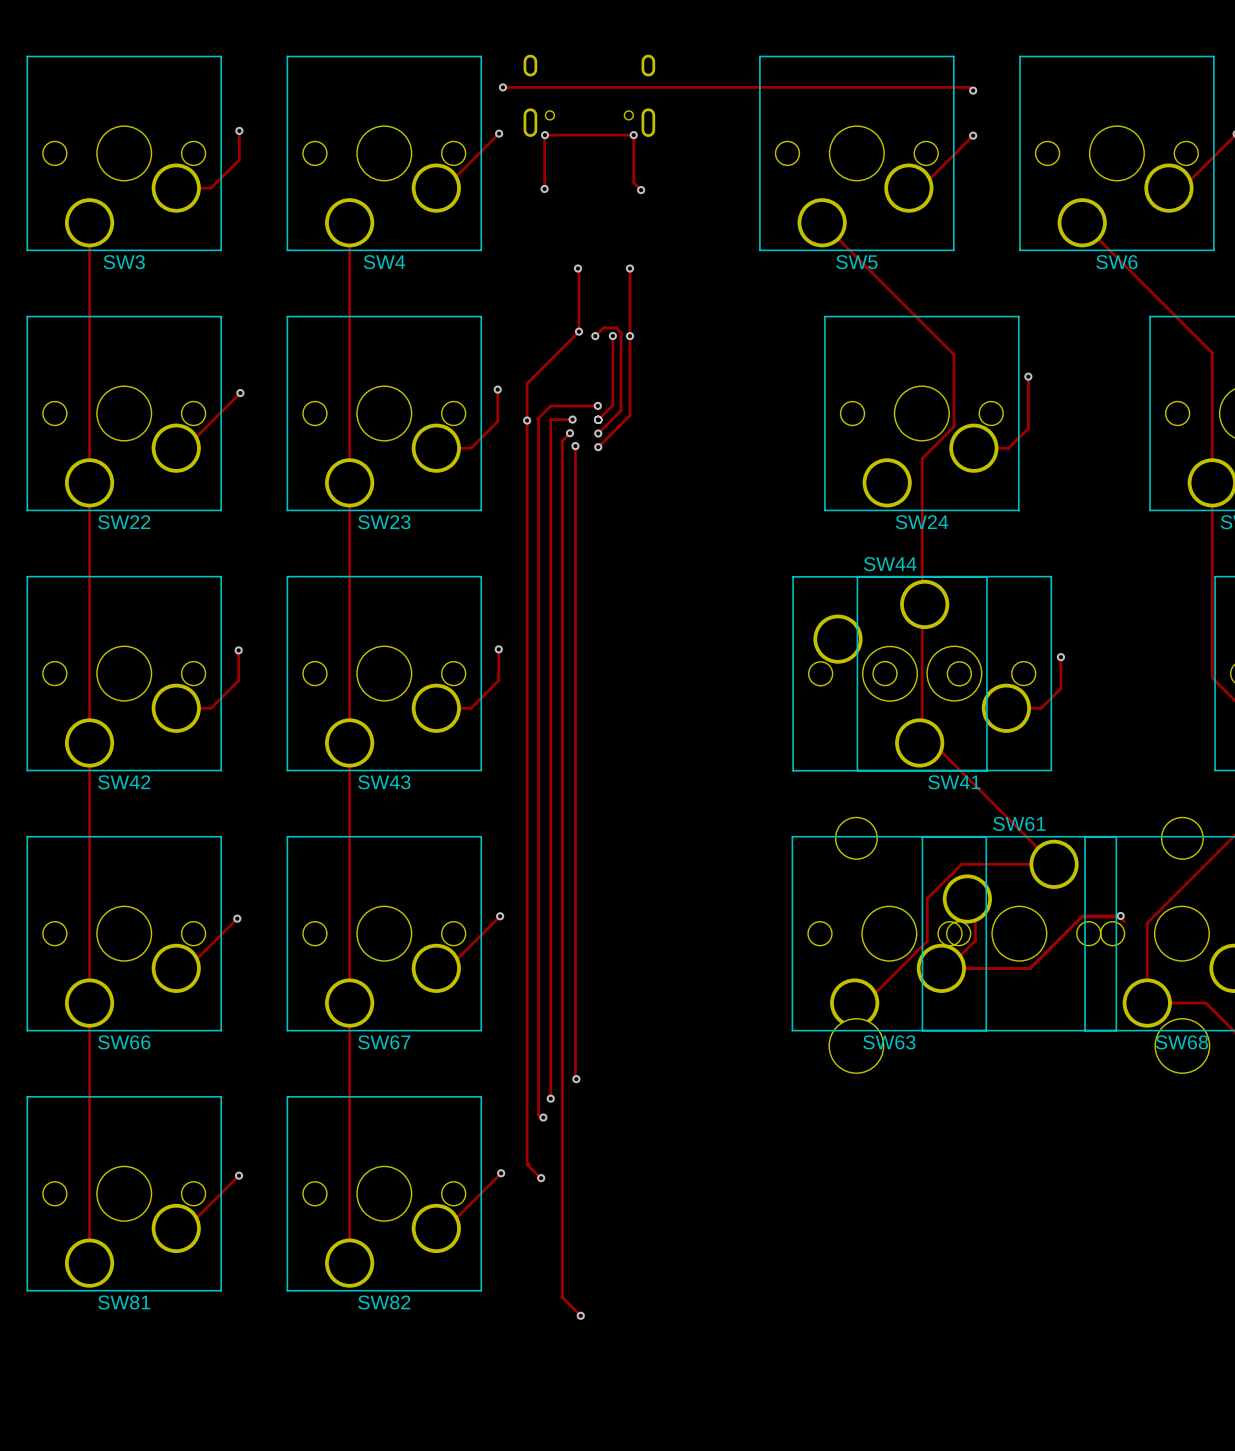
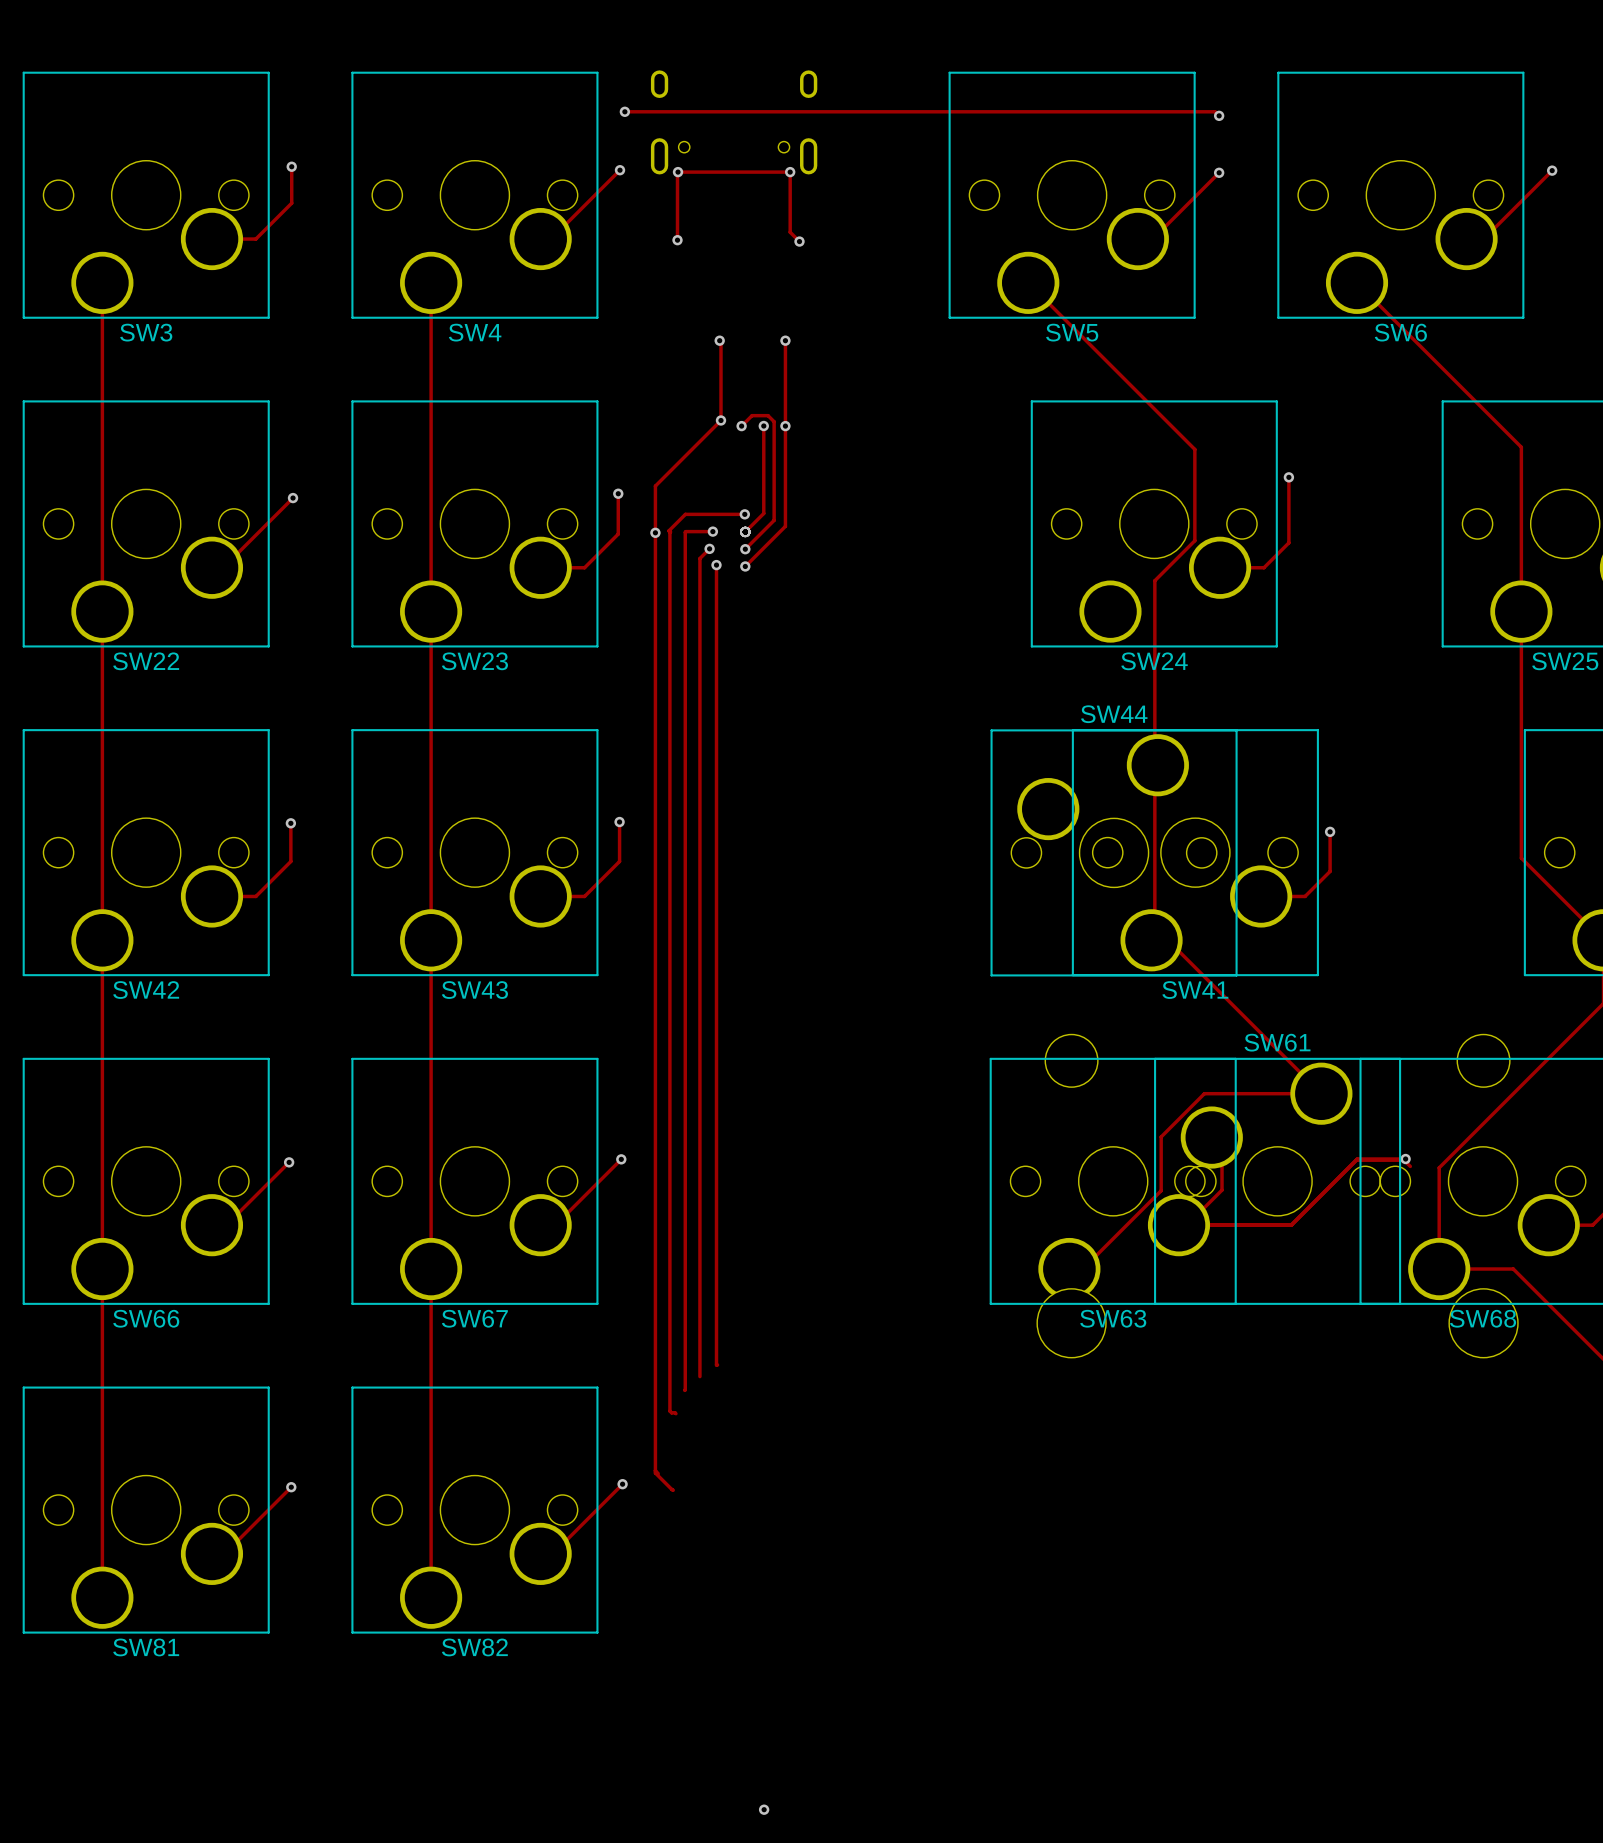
via: (576, 1079) -> none
track: (562, 1088) (562, 1297) (580, 1315) -> none
via: (550, 1098) -> none
via: (543, 1117) -> none
via: (541, 1178) -> none
via: (580, 1315) -> none
via: none -> (764, 1809)

